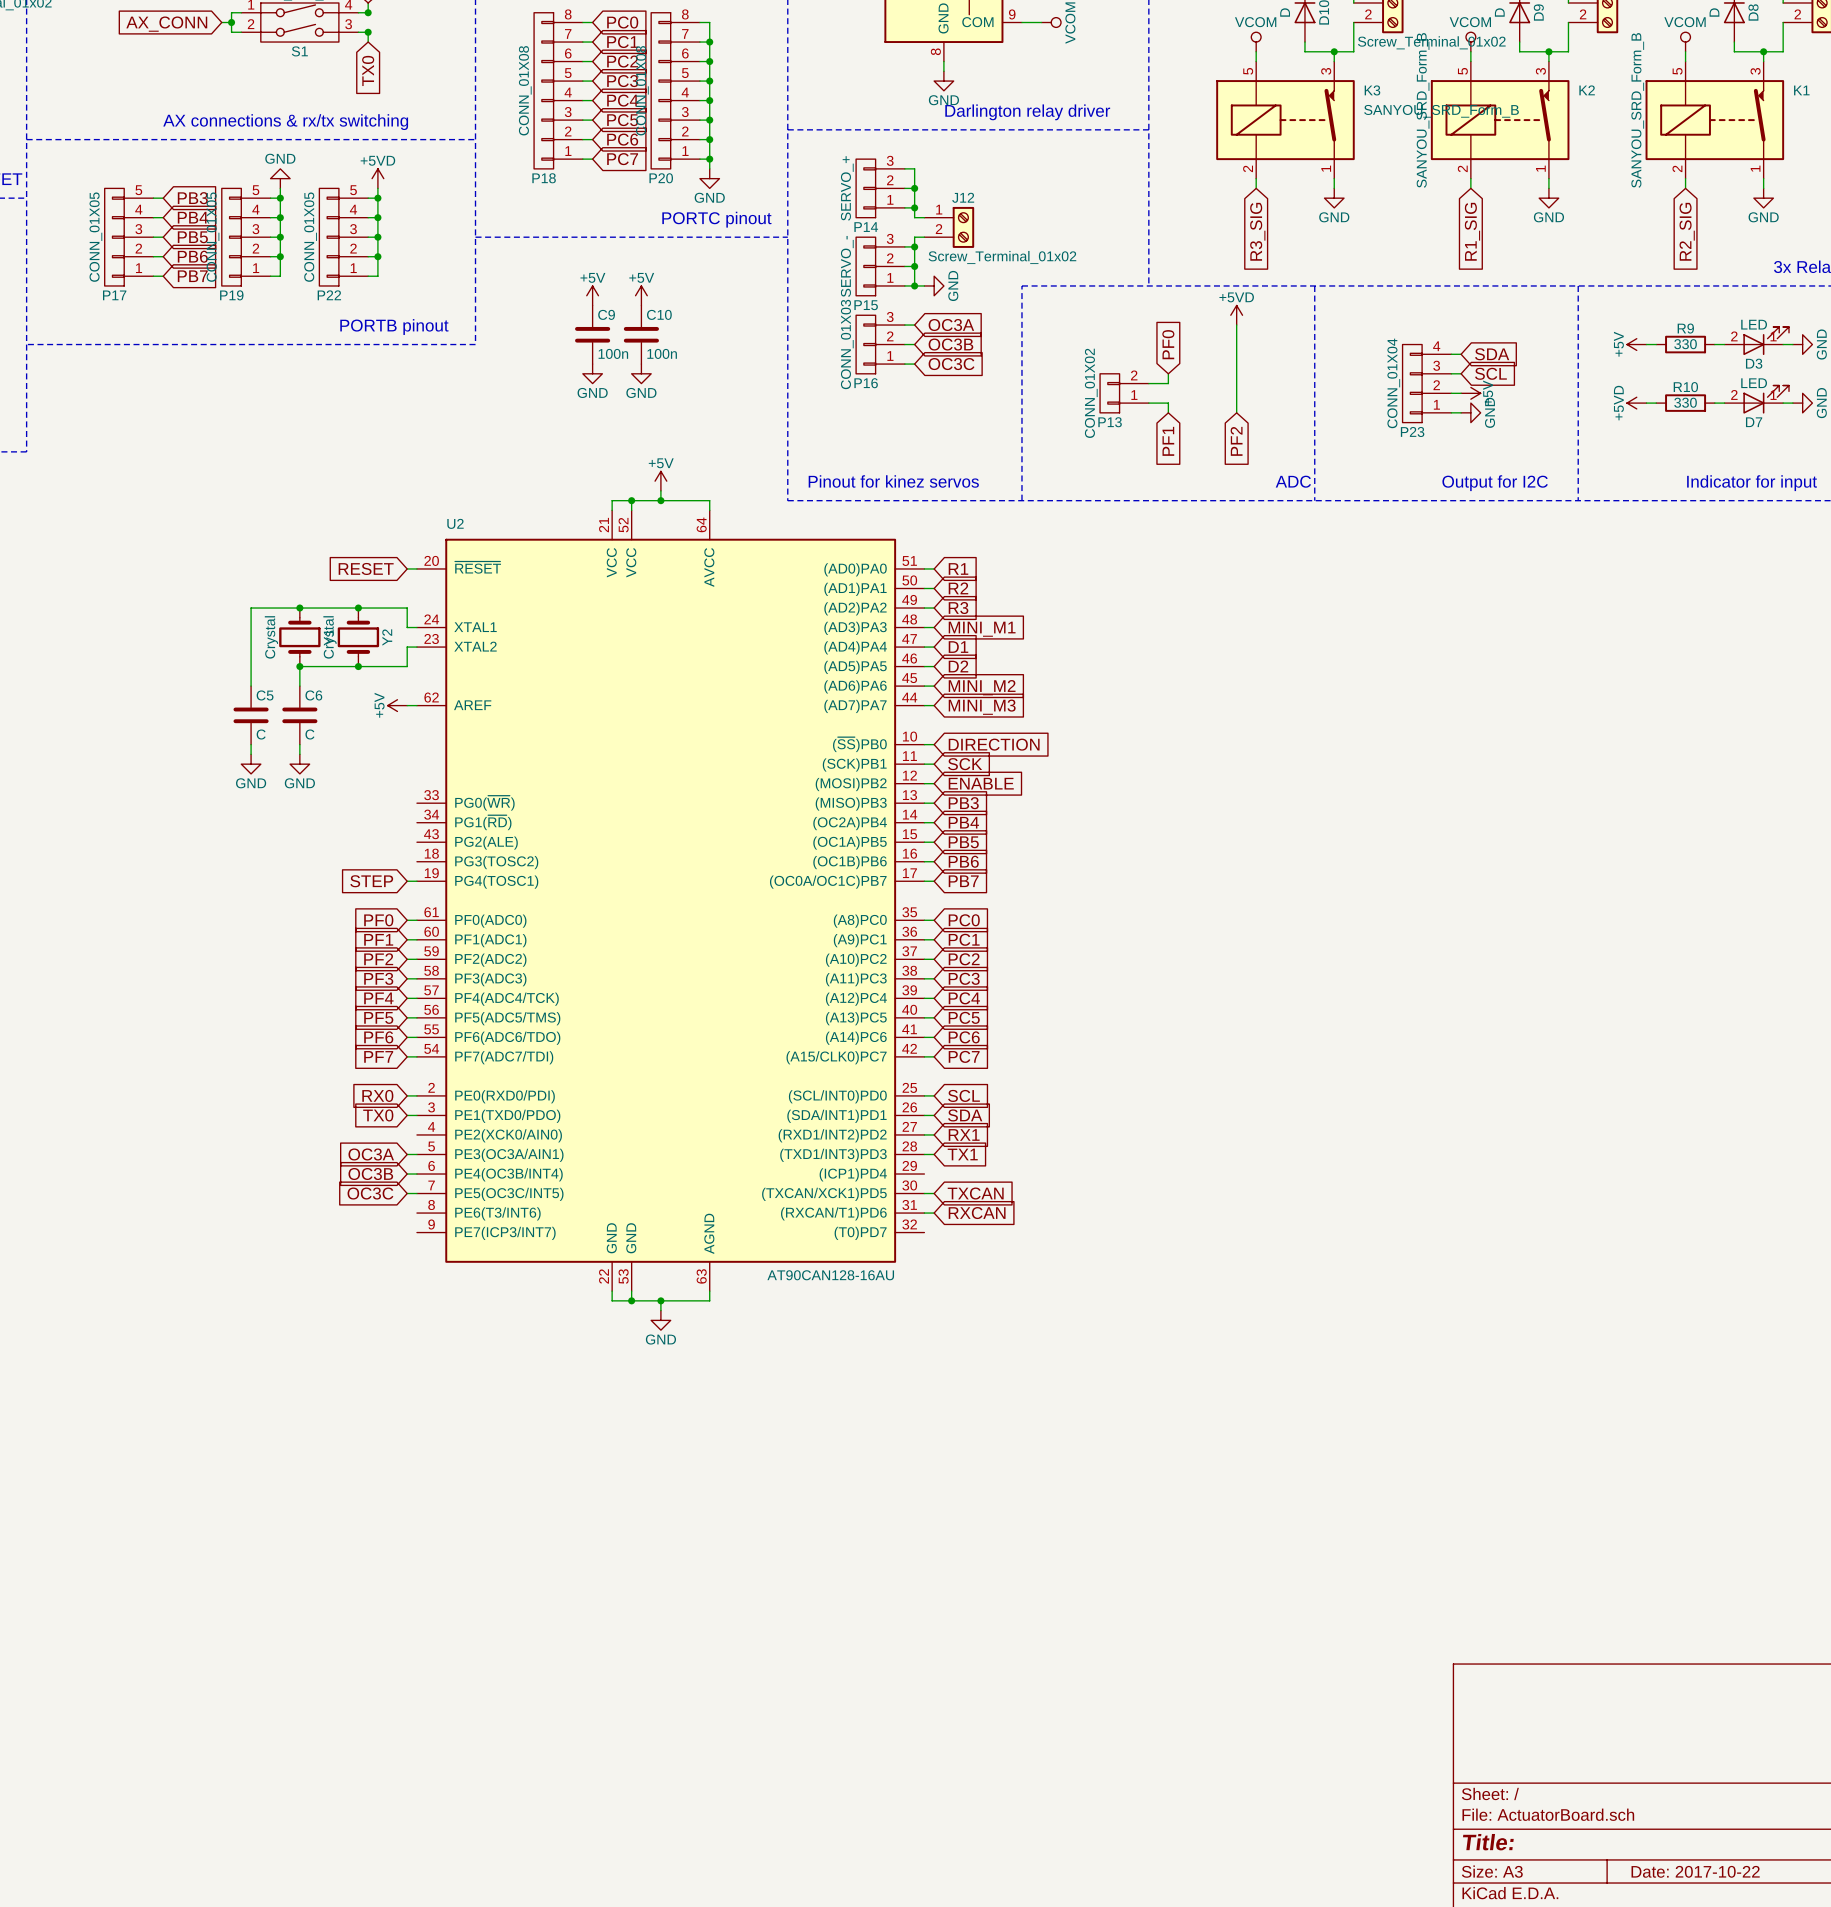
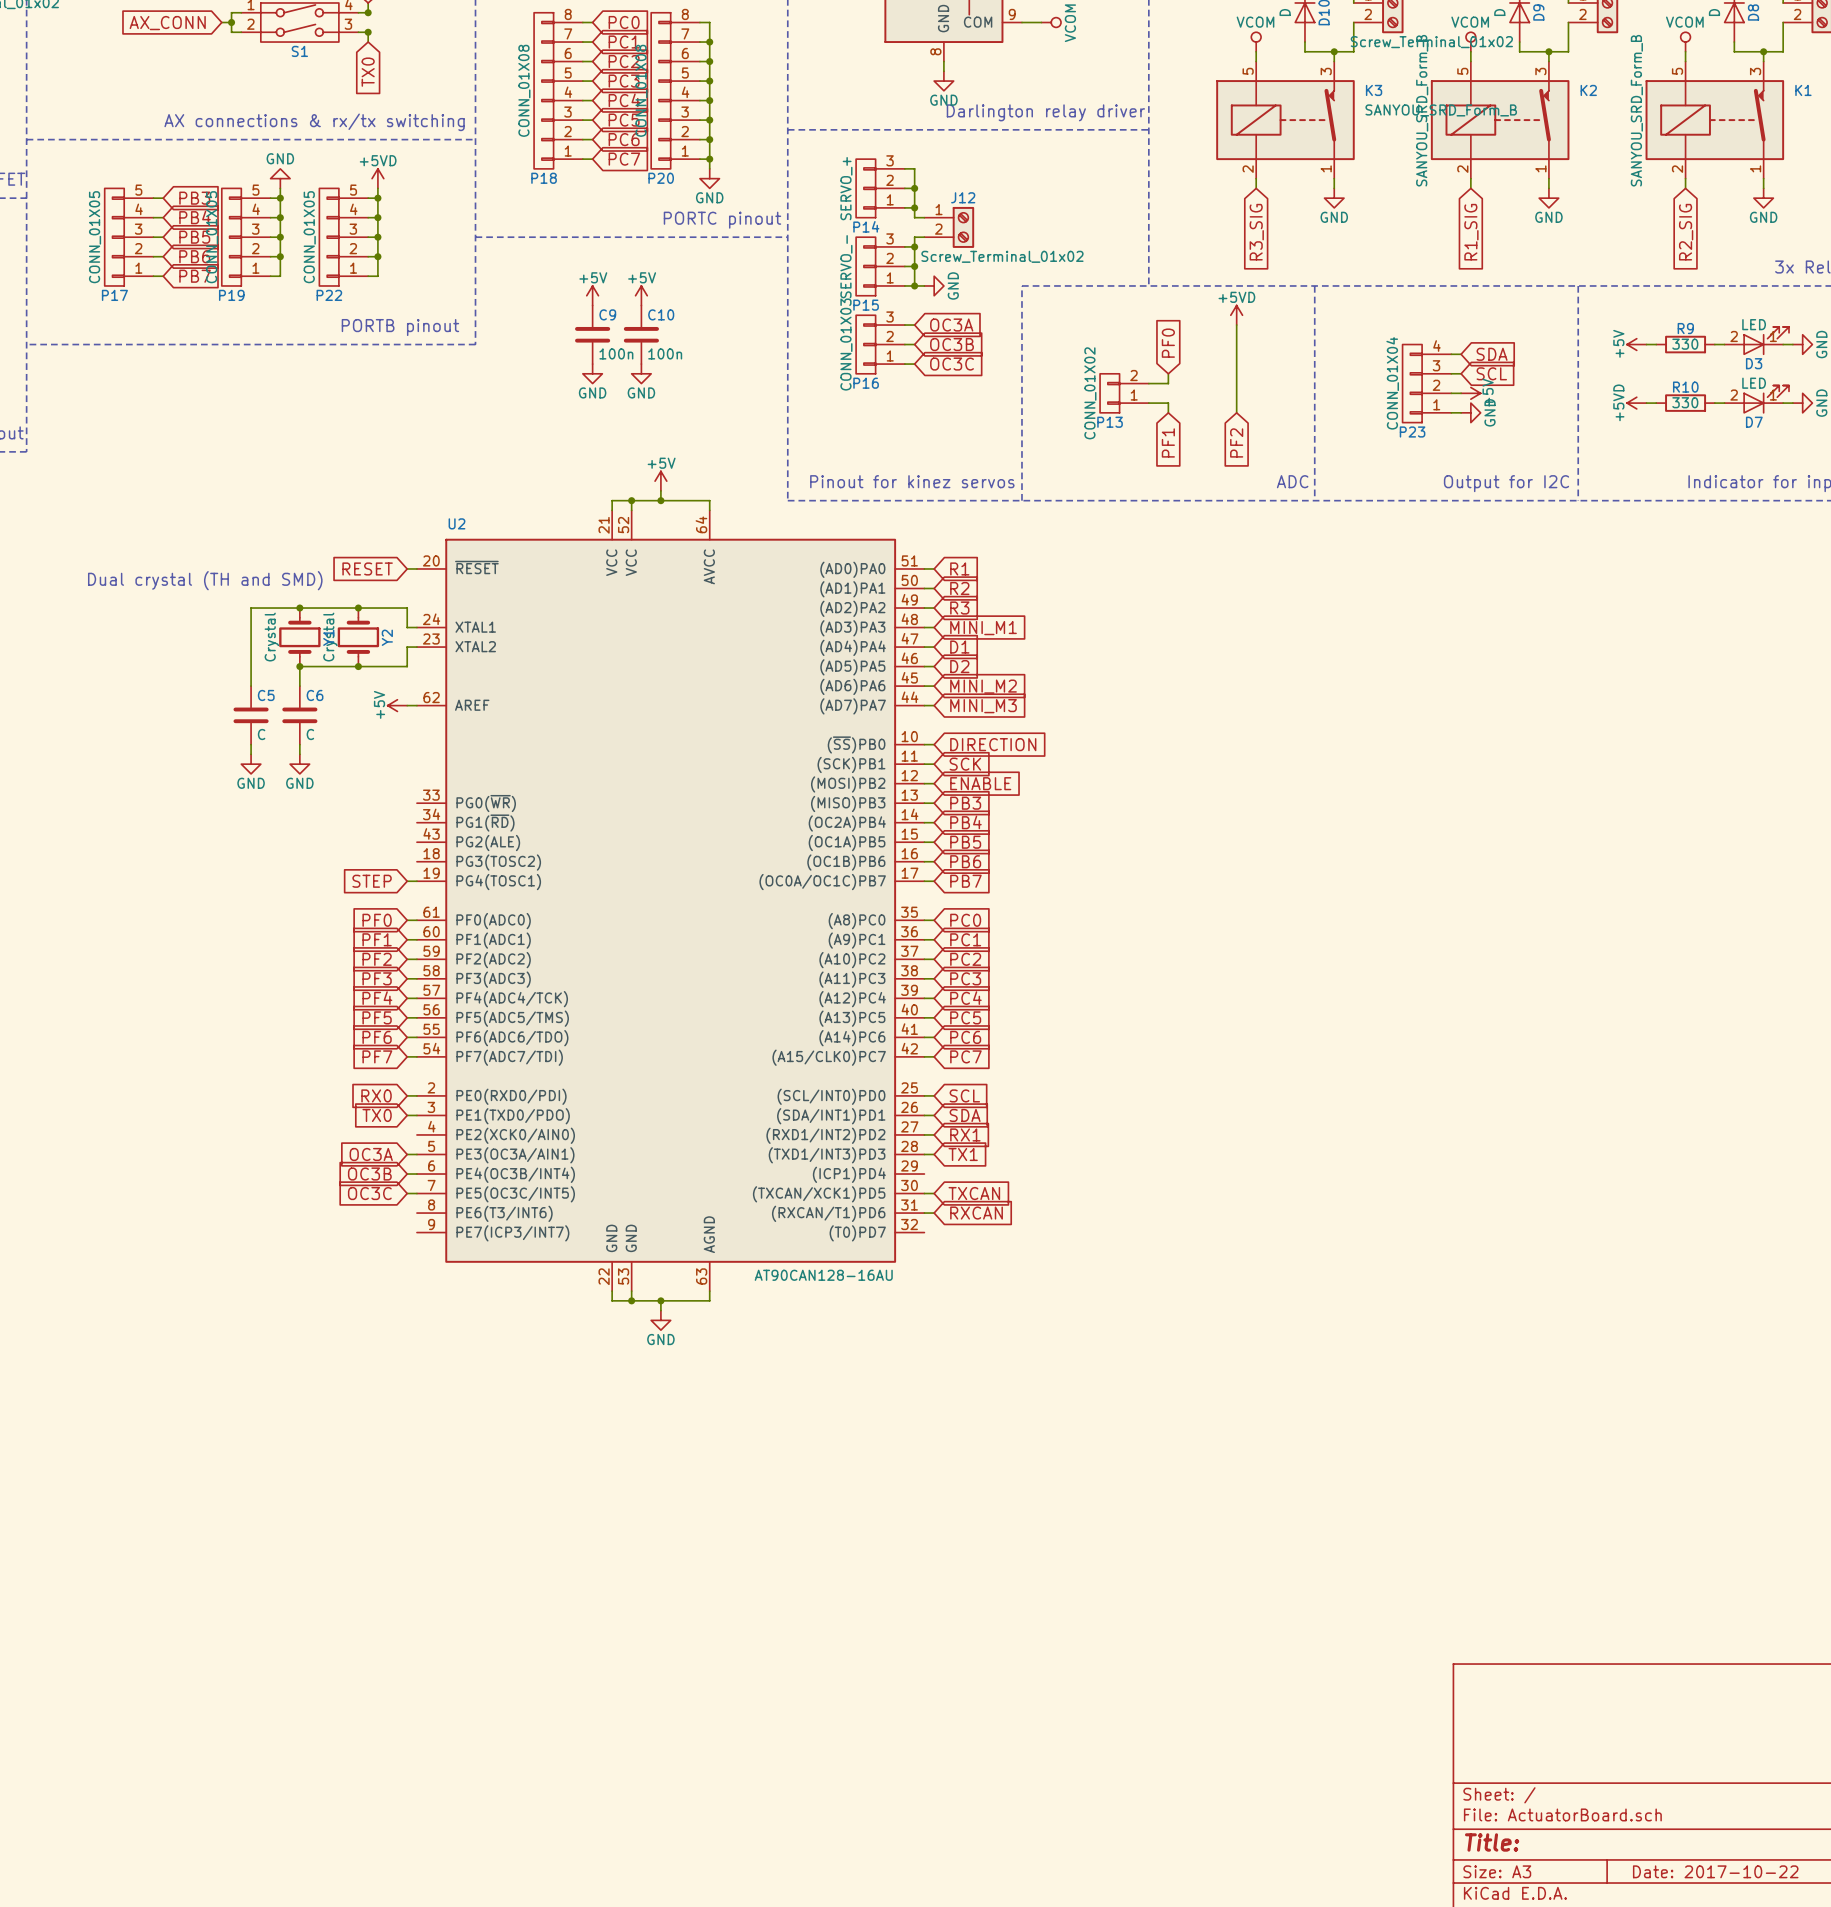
text: none -> Dual crystal (TH and SMD) (205, 580)

